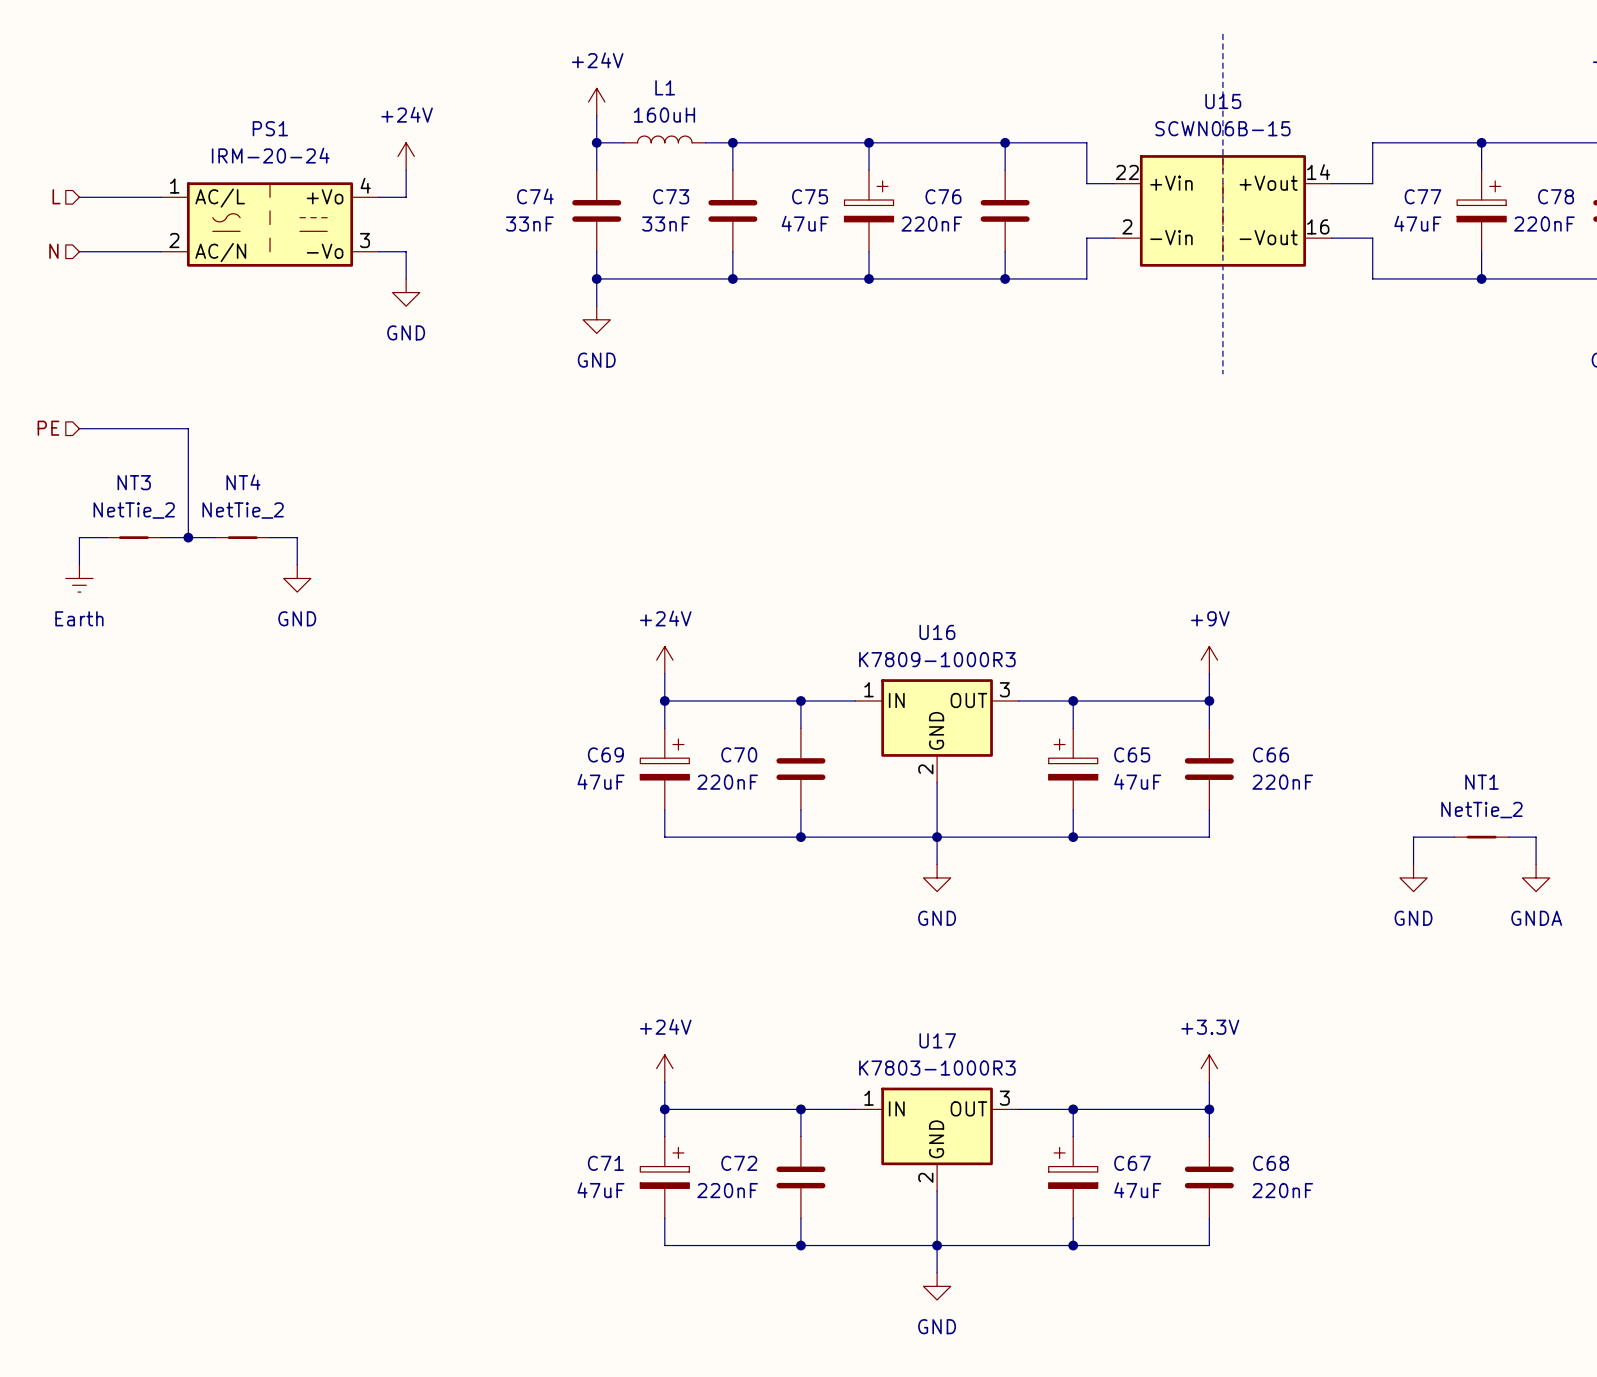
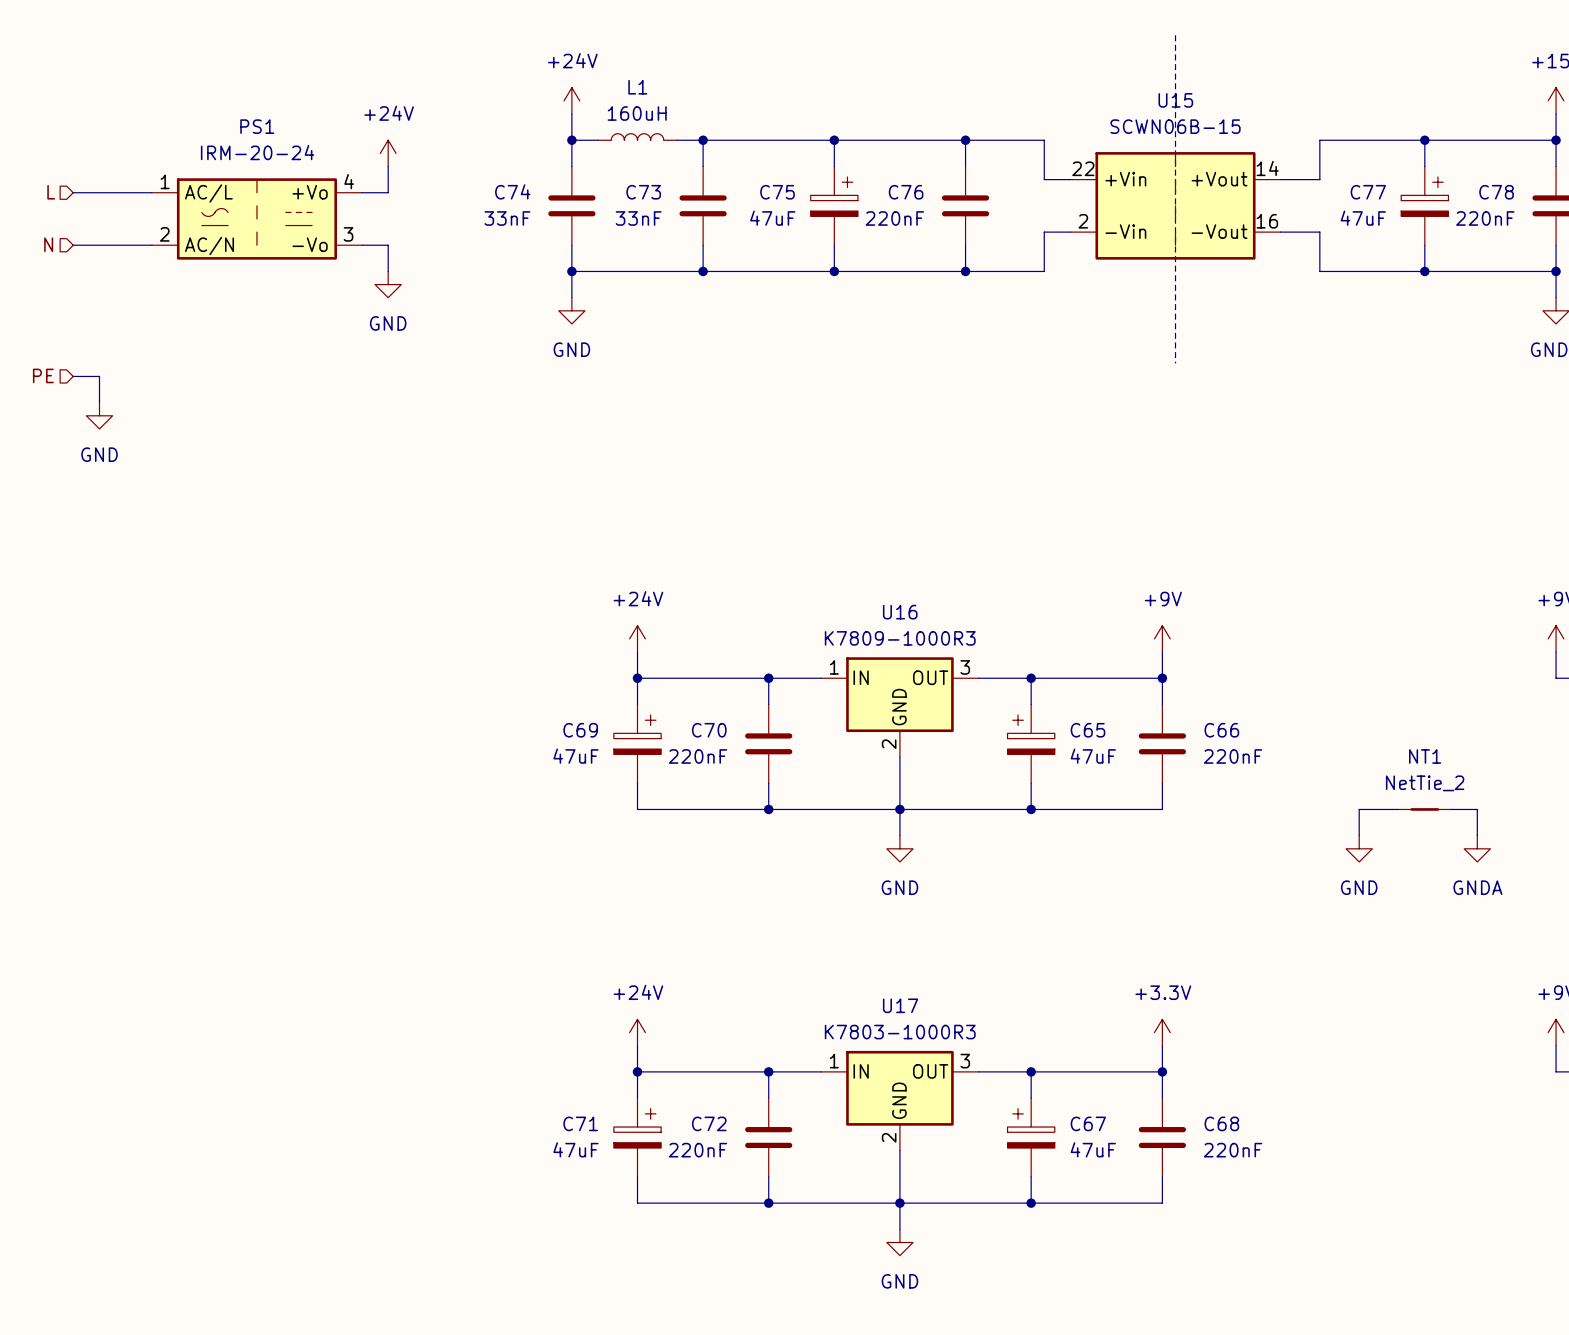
hierarchical label position: PE (48, 428) -> PE (43, 375)
wire: (79, 428) (188, 428) (188, 537) -> none
wire: (106, 537) (79, 537) (79, 564) -> none
NT3: NetTie_2 (133, 537) -> none
wire: (161, 537) (215, 537) -> none
junction: (188, 537) -> none
NT4: NetTie_2 (242, 537) -> none
wire: (270, 537) (297, 537) (297, 564) -> (73, 376) (99, 376) (99, 402)
power symbol: Earth (79, 578) -> none
power symbol position: GND (297, 578) -> GND (99, 415)

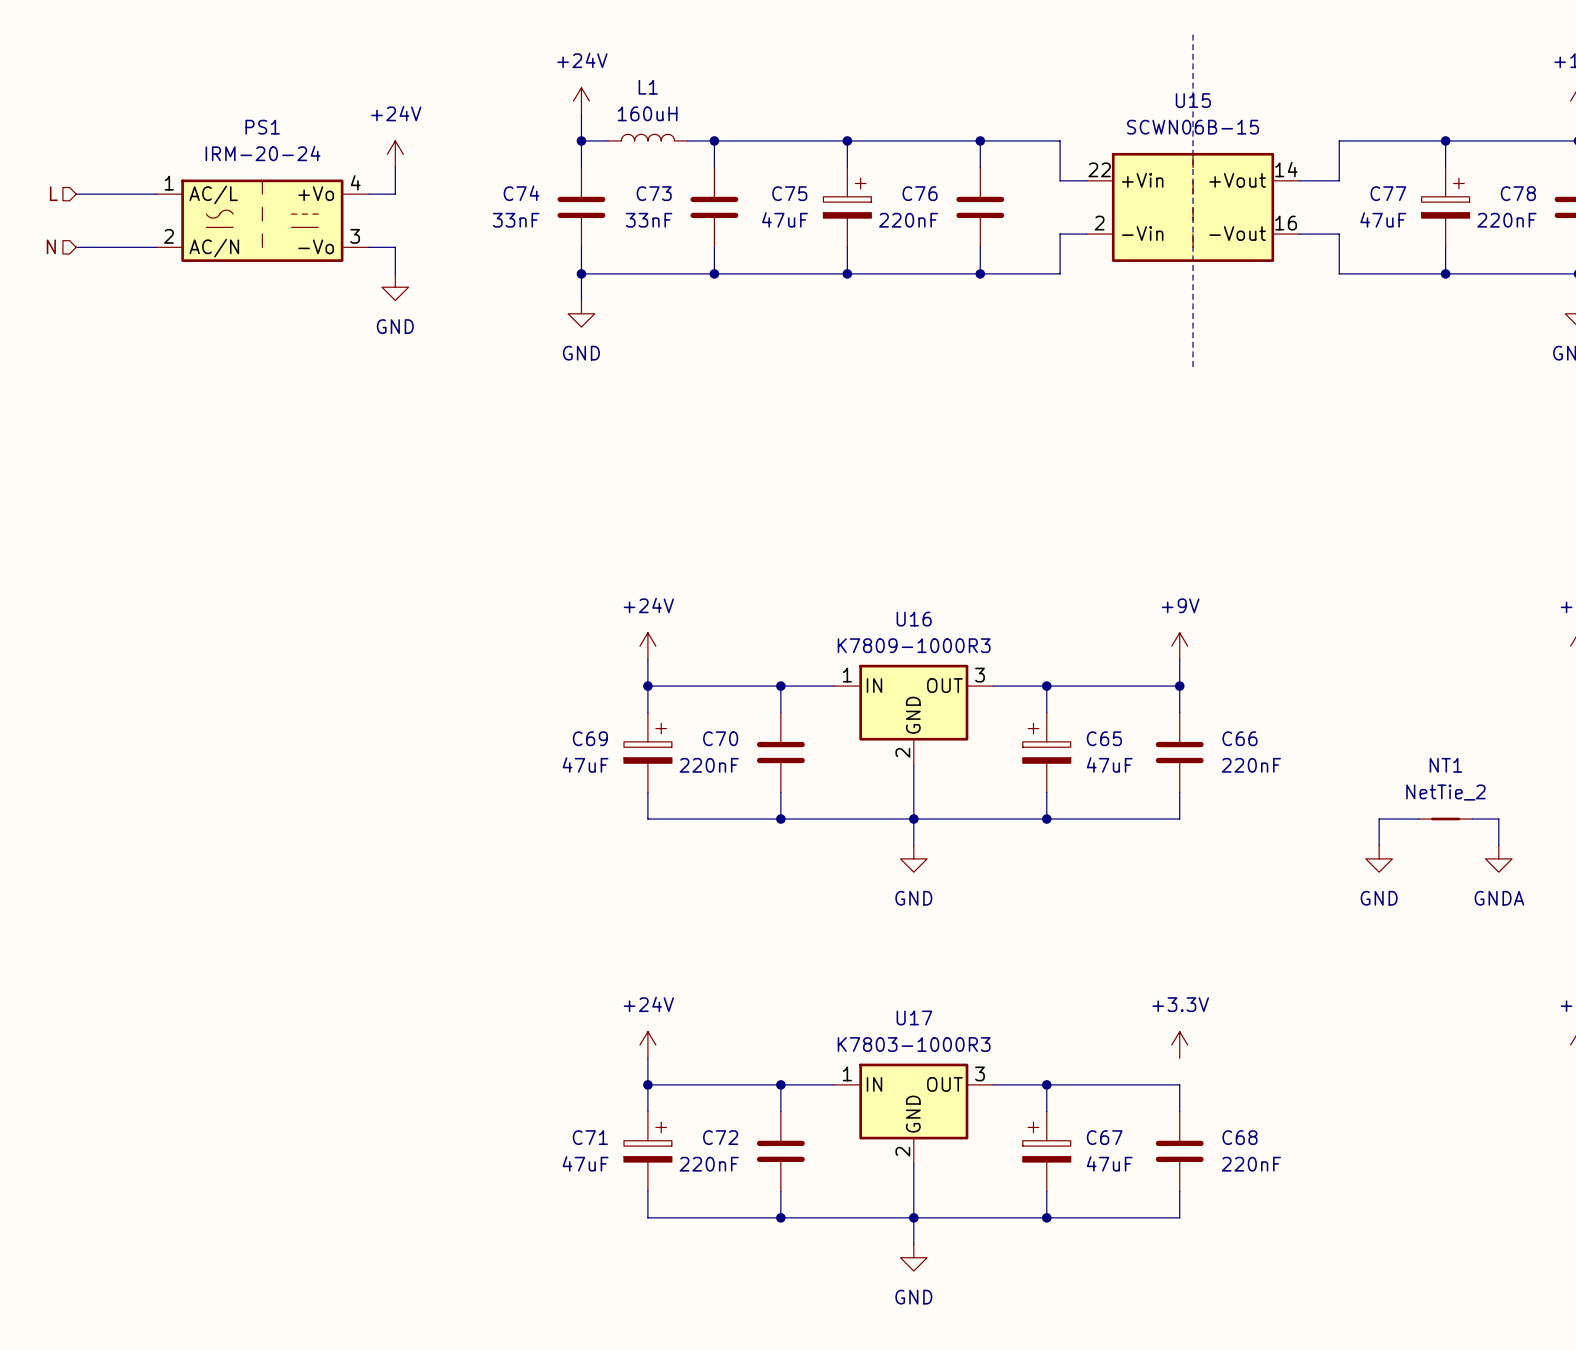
hierarchical label: PE (43, 375) -> none
wire: (73, 376) (99, 376) (99, 402) -> none
power symbol: GND (99, 415) -> none
wire: (1162, 1045) (1162, 1071) -> none
junction: (1162, 1071) -> none

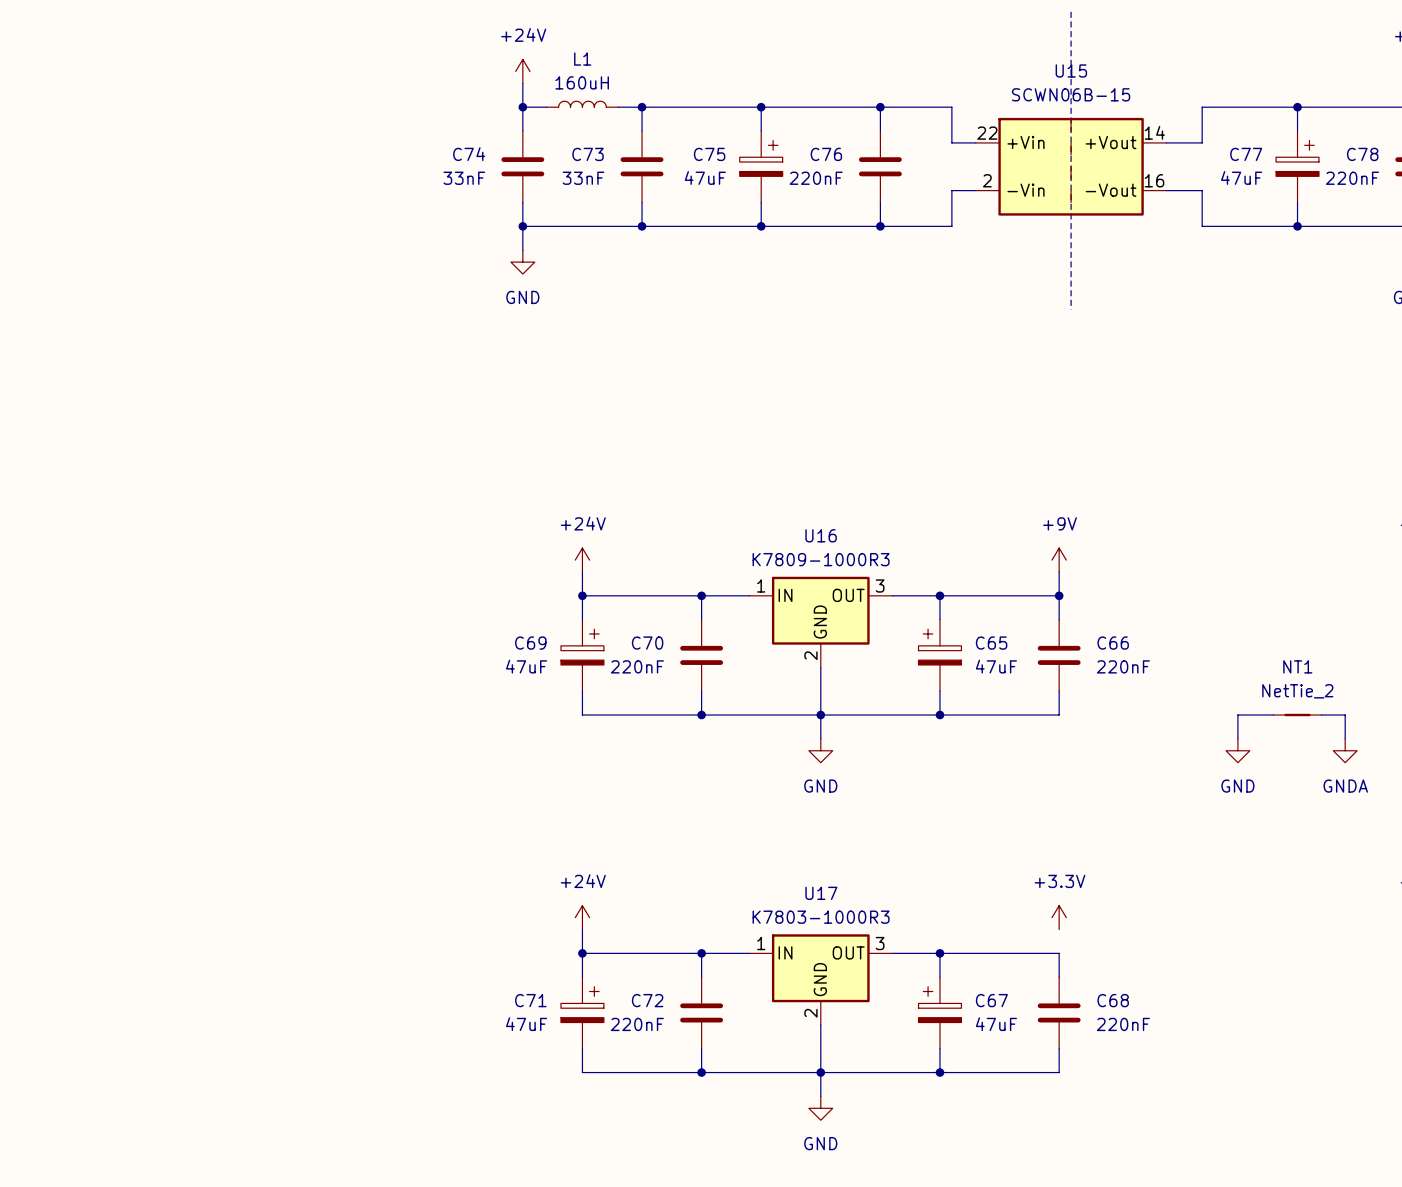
power symbol: +24V (395, 154) -> none
wire: (395, 167) (395, 194) (368, 194) -> none
hierarchical label: L (53, 193) -> none
wire: (76, 194) (156, 194) -> none
PS1: IRM-20-24 (262, 220) -> none
hierarchical label: N (51, 246) -> none
wire: (76, 247) (156, 247) -> none
wire: (368, 247) (395, 247) (395, 273) -> none
power symbol: GND (395, 287) -> none

